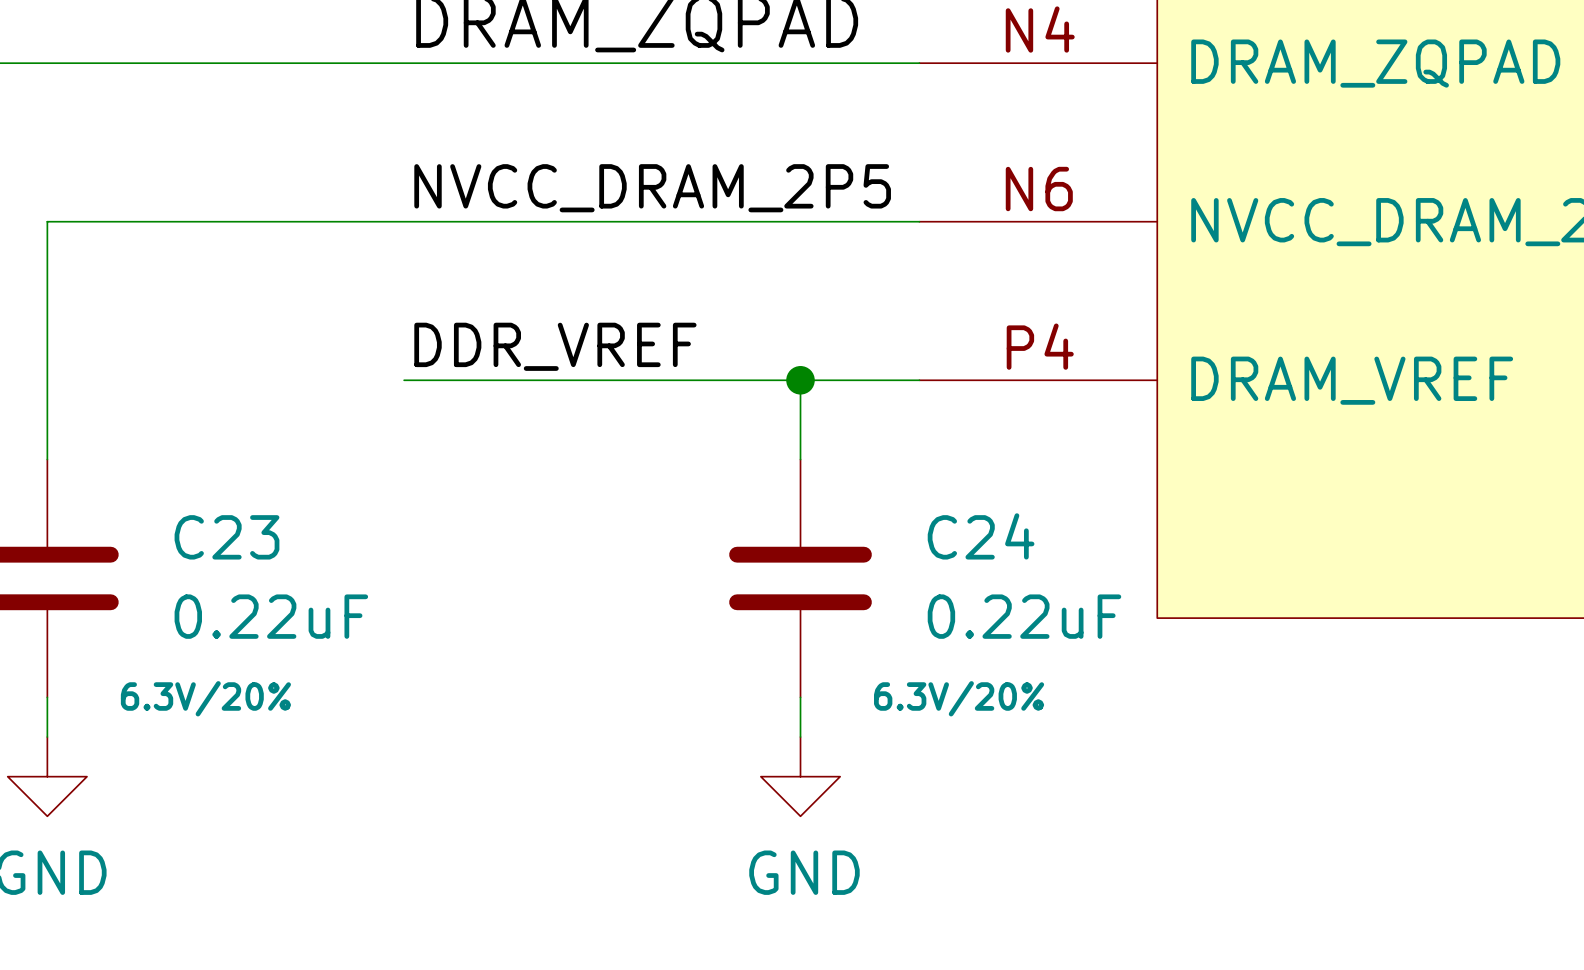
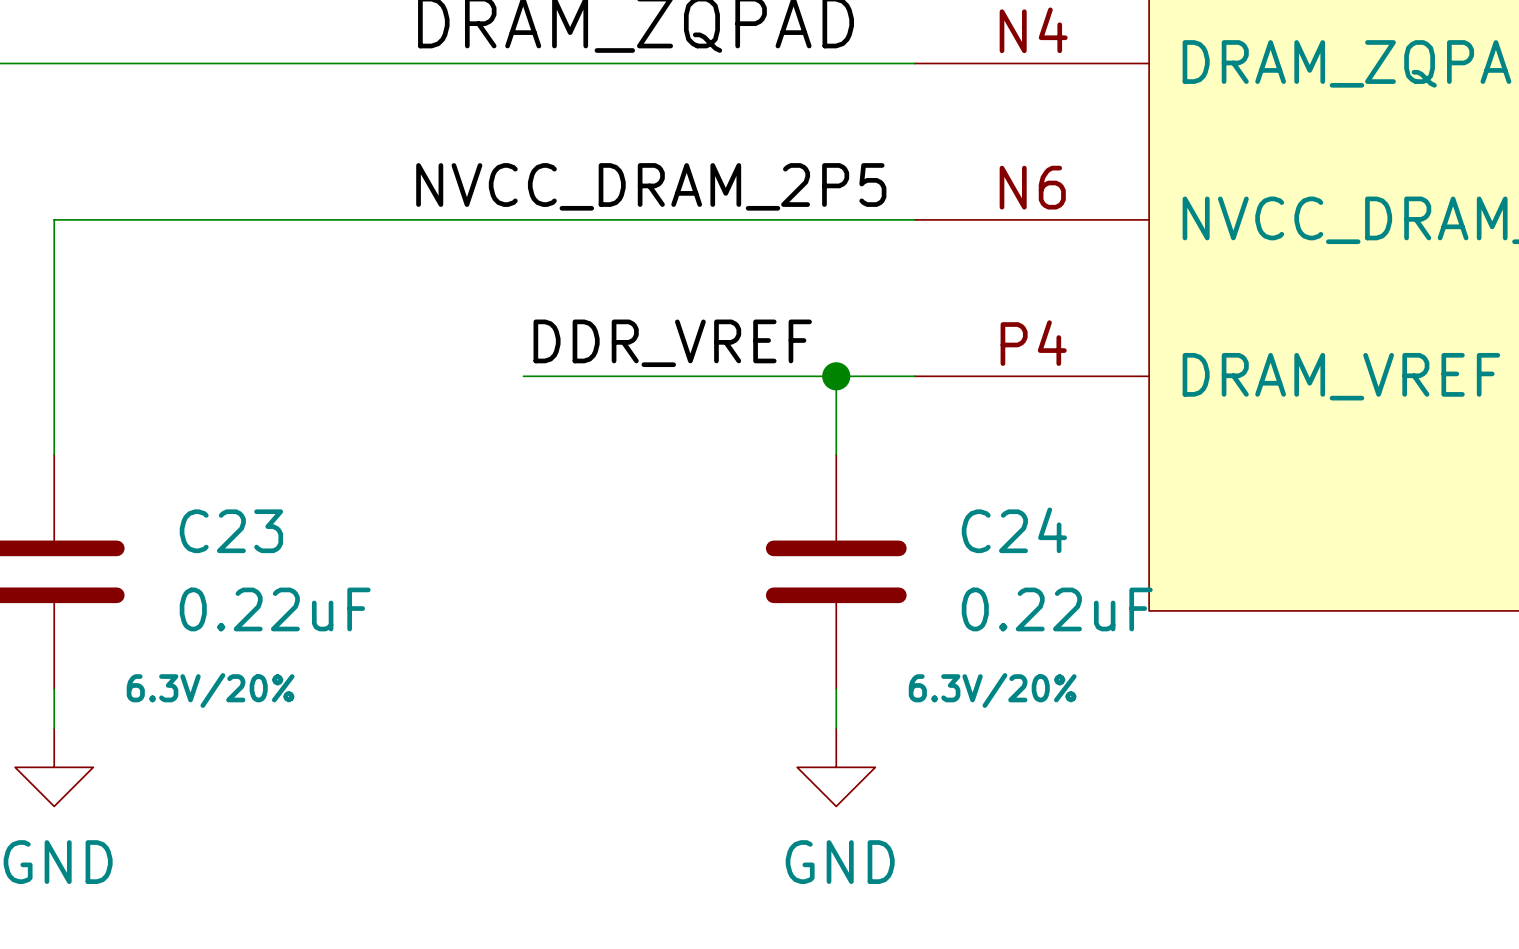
label position: DDR_VREF (555, 346) -> DDR_VREF (672, 343)
wire: (404, 380) (523, 380) -> none
wire: (800, 380) (800, 459) -> (836, 376) (836, 454)
junction position: (800, 380) -> (836, 376)
C24 position: (800, 578) -> (836, 571)
wire: (800, 697) (800, 737) -> (836, 689) (836, 728)
power symbol position: GND (800, 776) -> GND (836, 767)

